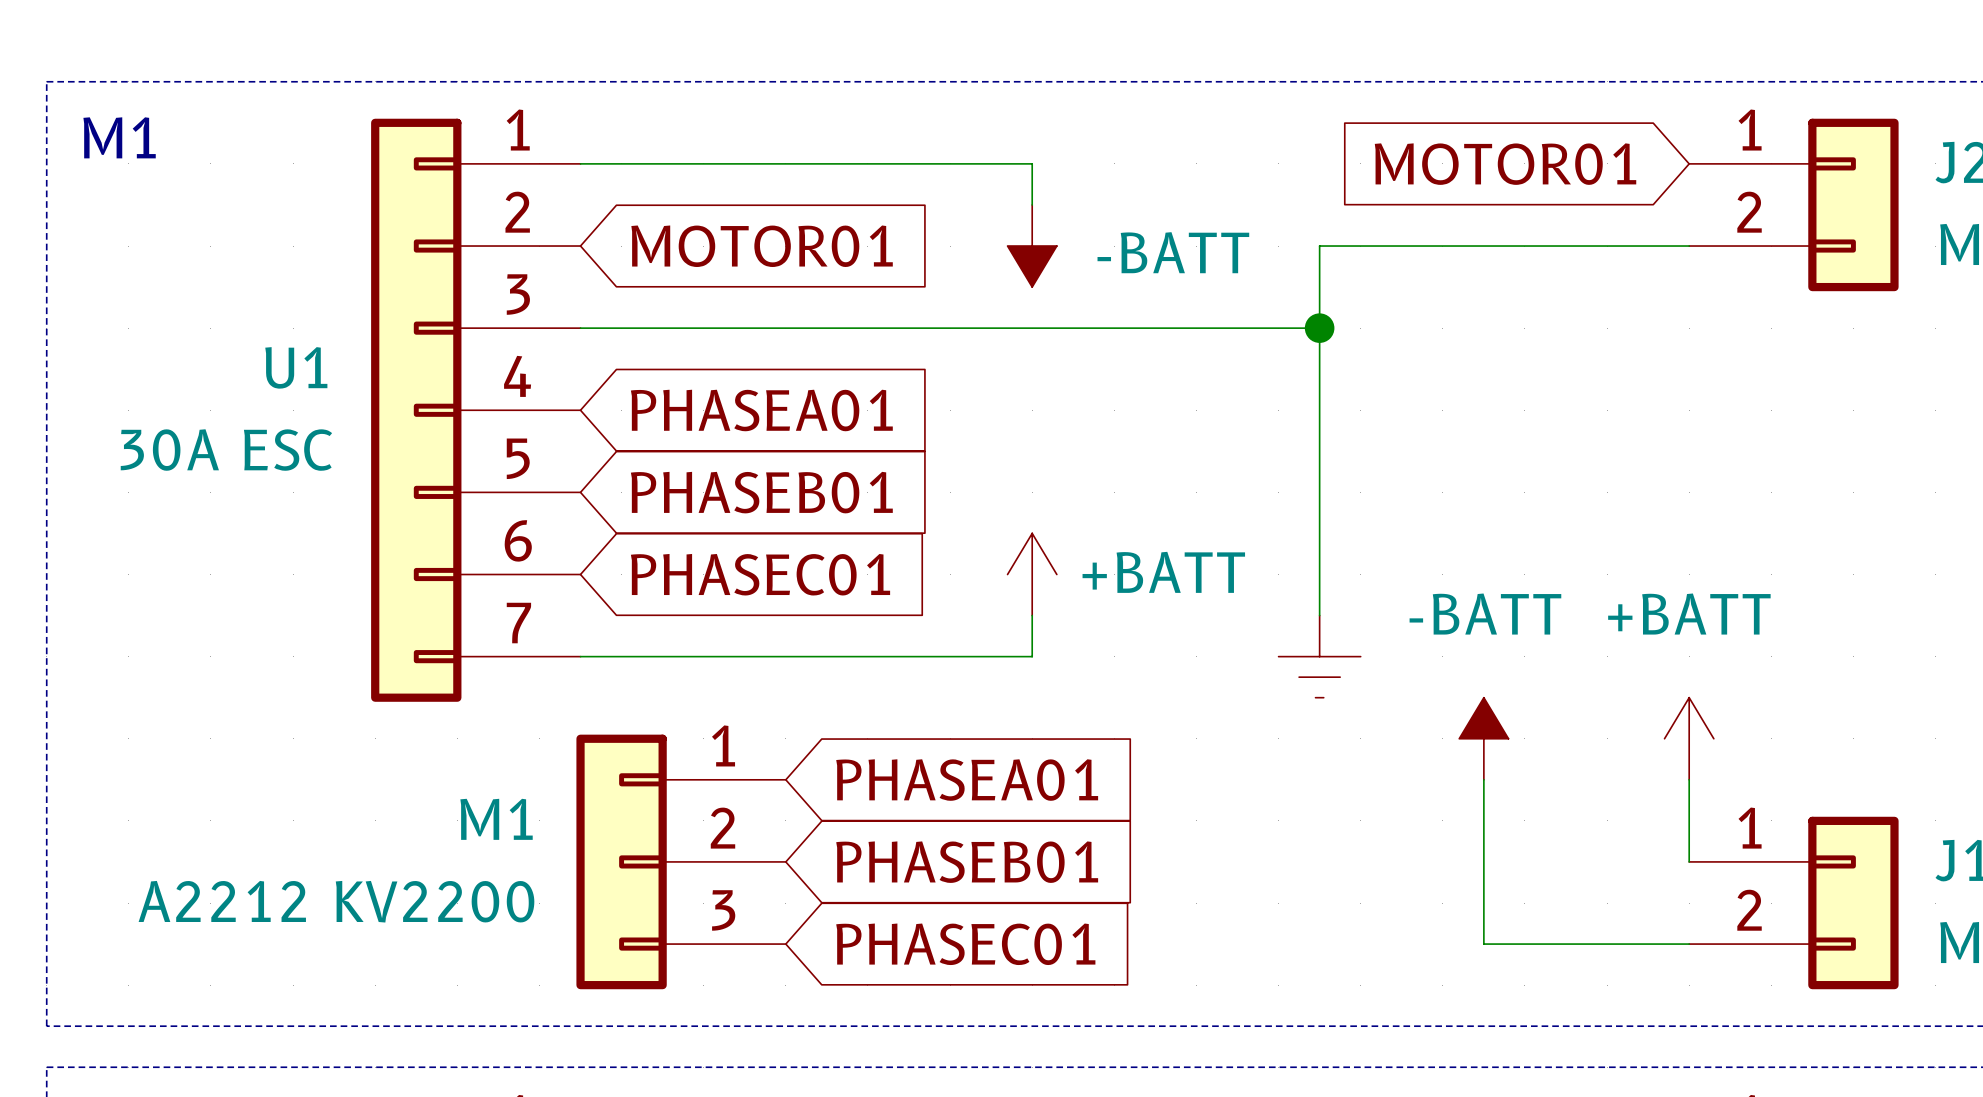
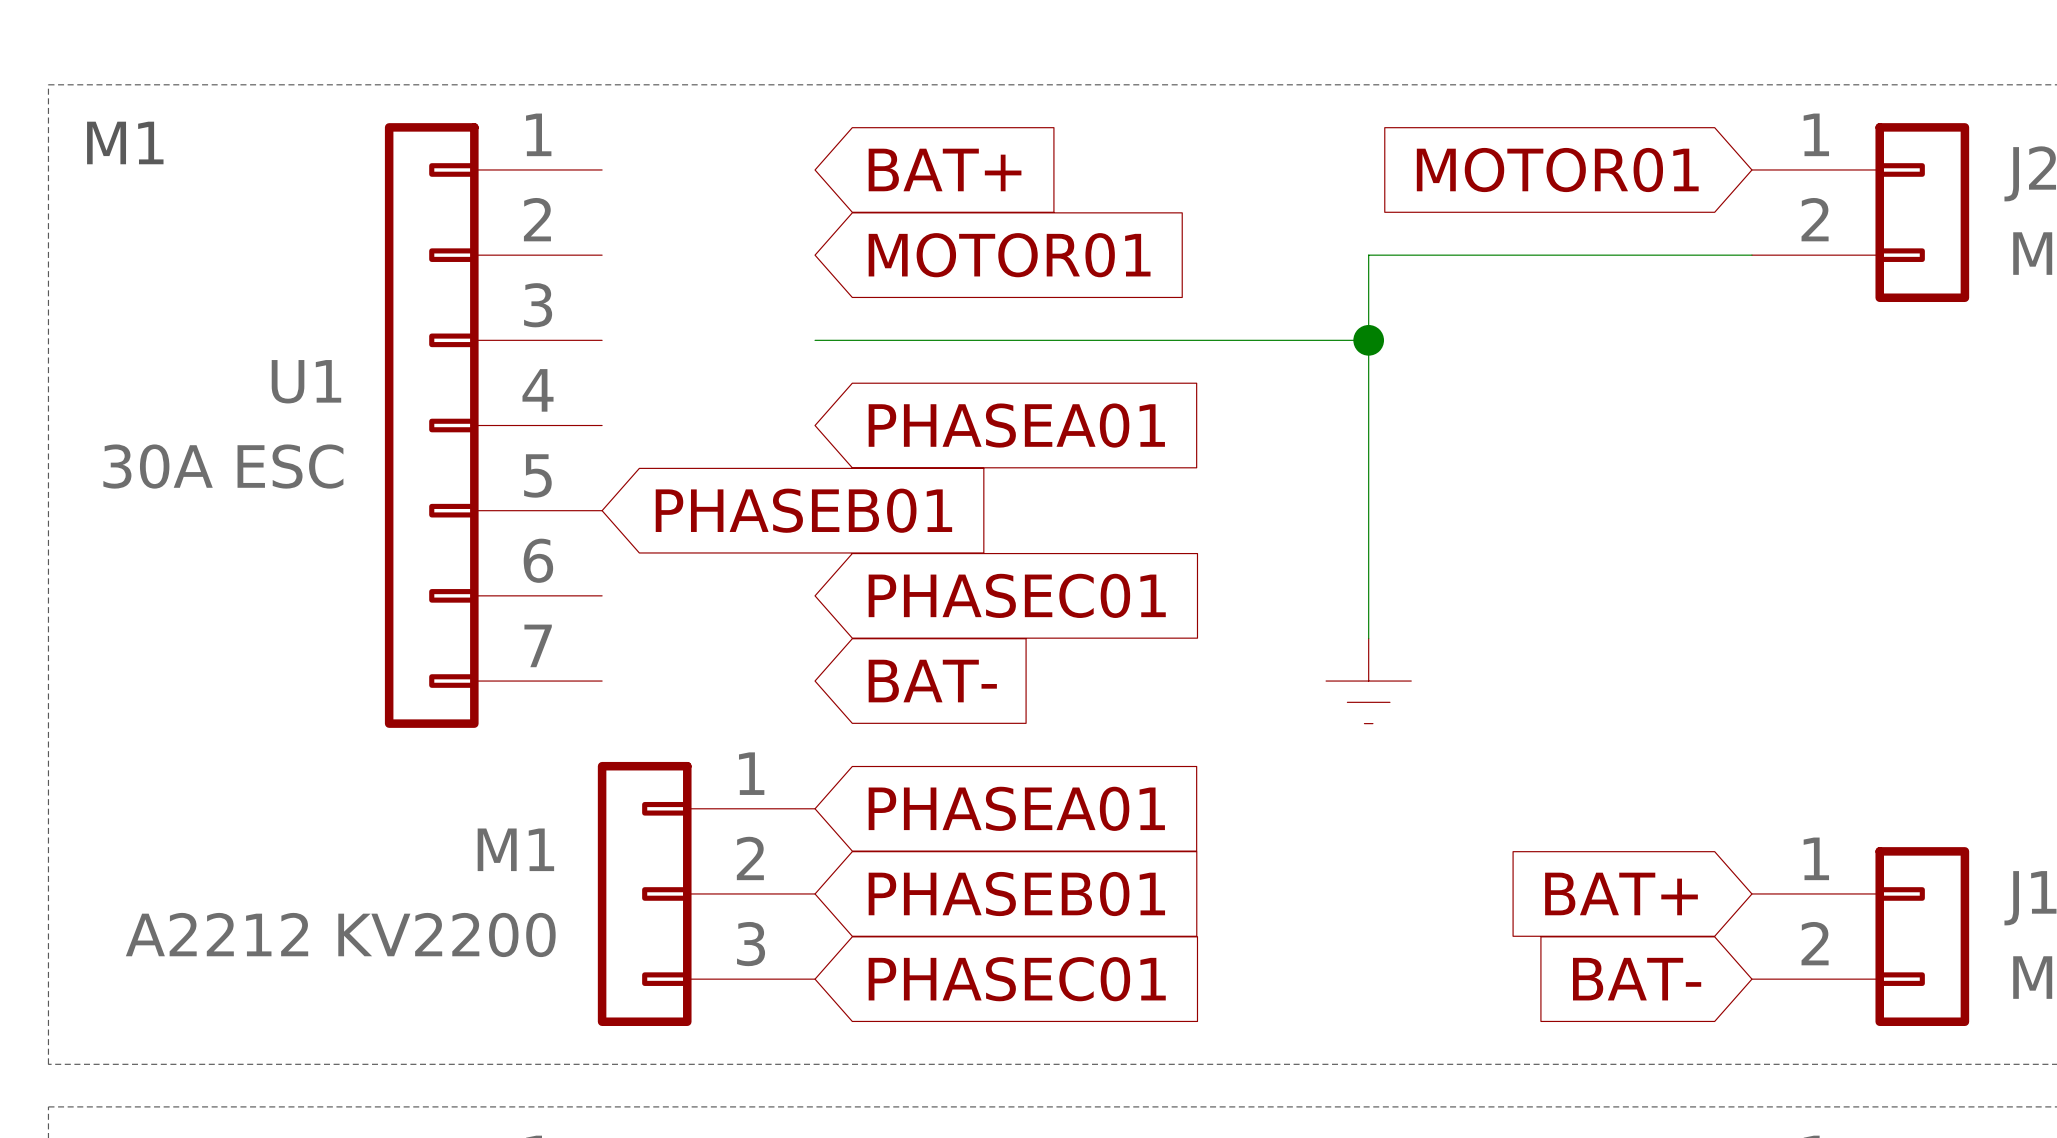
wire: (580, 163) (1032, 163) (1032, 204) -> none
global label: none -> BAT+ (945, 169)
global label position: MOTOR01 (762, 246) -> MOTOR01 (1009, 255)
power symbol: -BATT (1032, 246) -> none
wire: (580, 328) (785, 328) -> none
global label position: PHASEA01 (761, 410) -> PHASEA01 (1016, 425)
global label position: PHASEC01 (760, 574) -> PHASEC01 (1017, 595)
power symbol: +BATT (1032, 574) -> none
wire: (1032, 615) (1032, 656) (580, 656) -> none
global label: none -> BAT- (932, 681)
power symbol: -BATT (1483, 738) -> none
power symbol: +BATT (1689, 738) -> none
wire: (1483, 779) (1483, 944) (1689, 944) -> none
wire: (1689, 779) (1689, 861) -> none
global label: none -> BAT+ (1621, 893)
global label: none -> BAT- (1637, 979)

